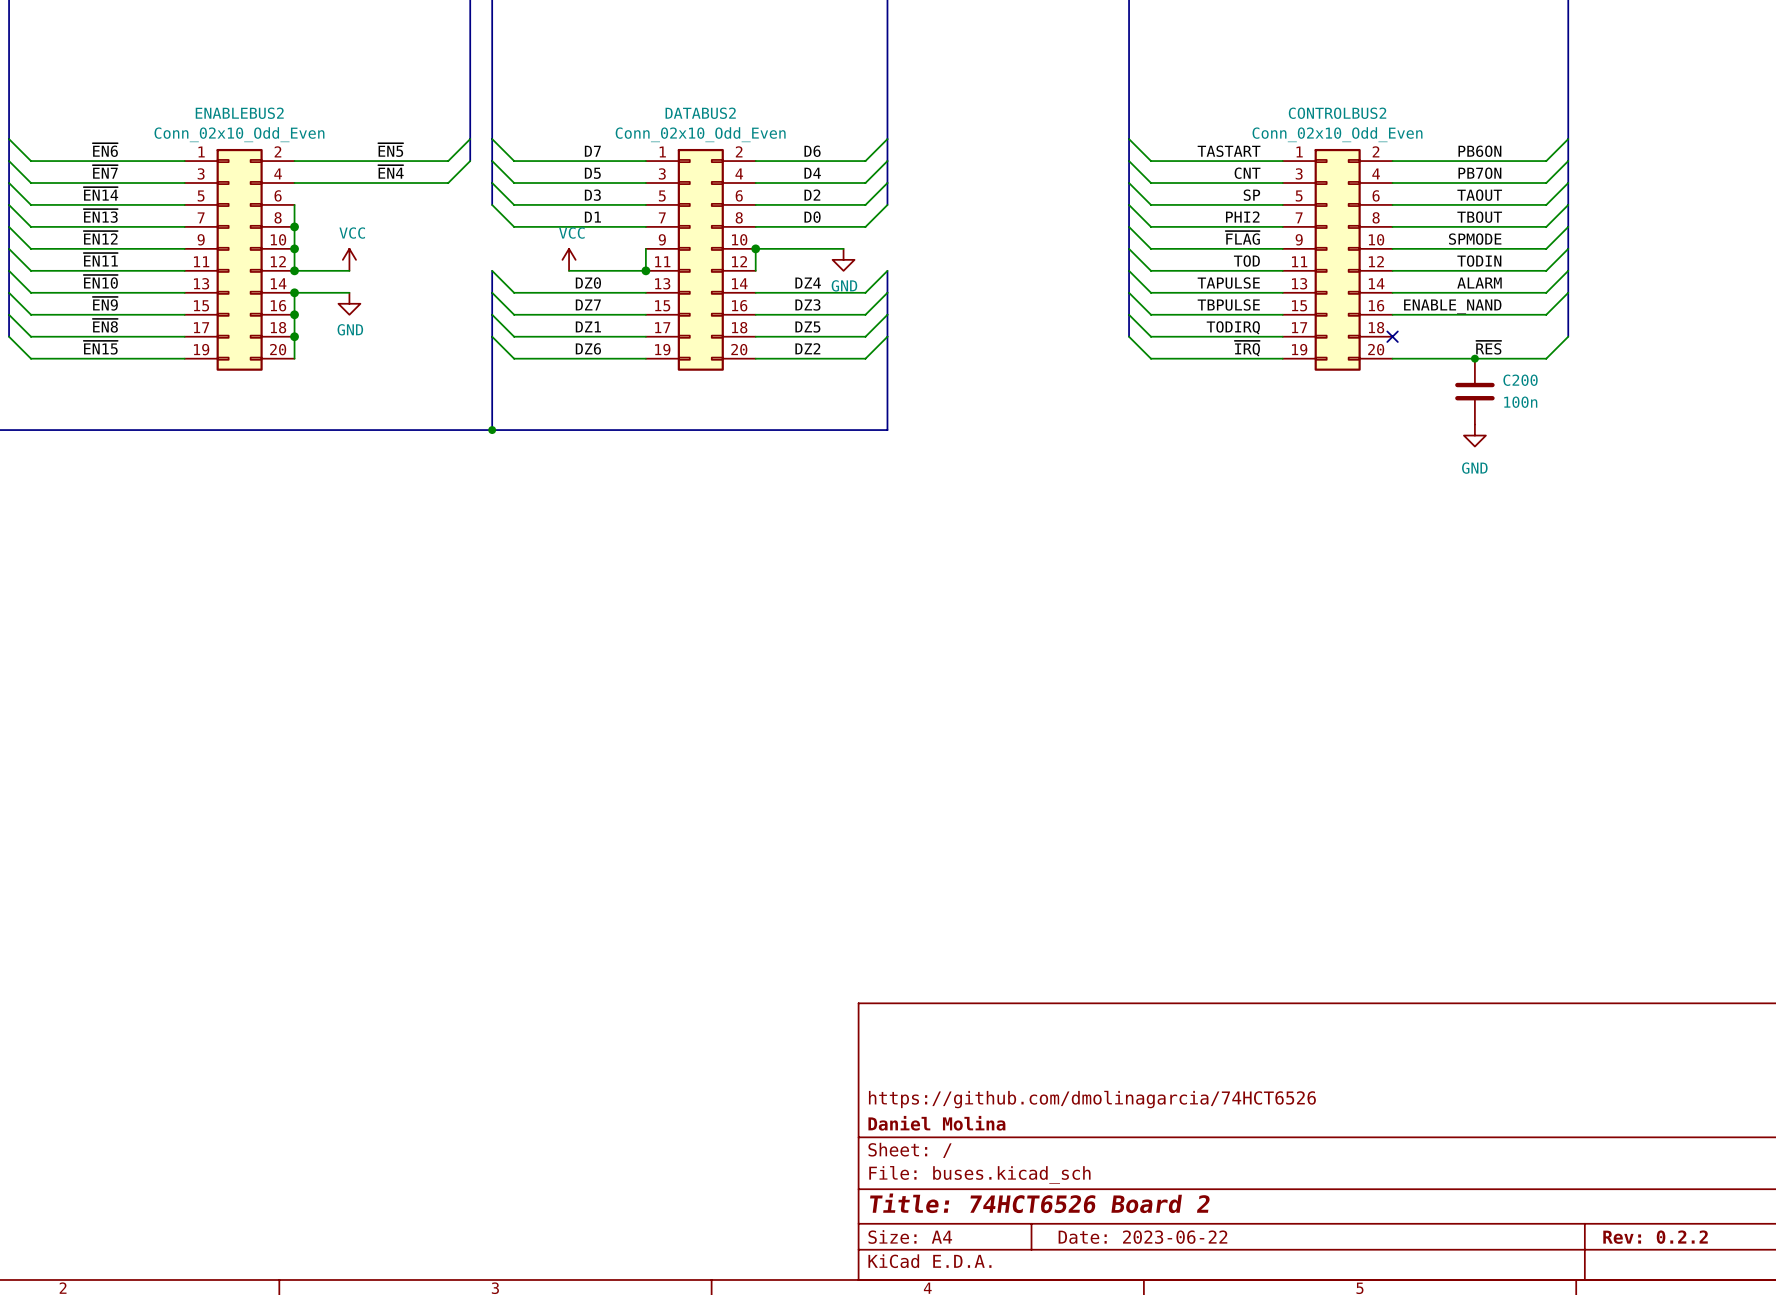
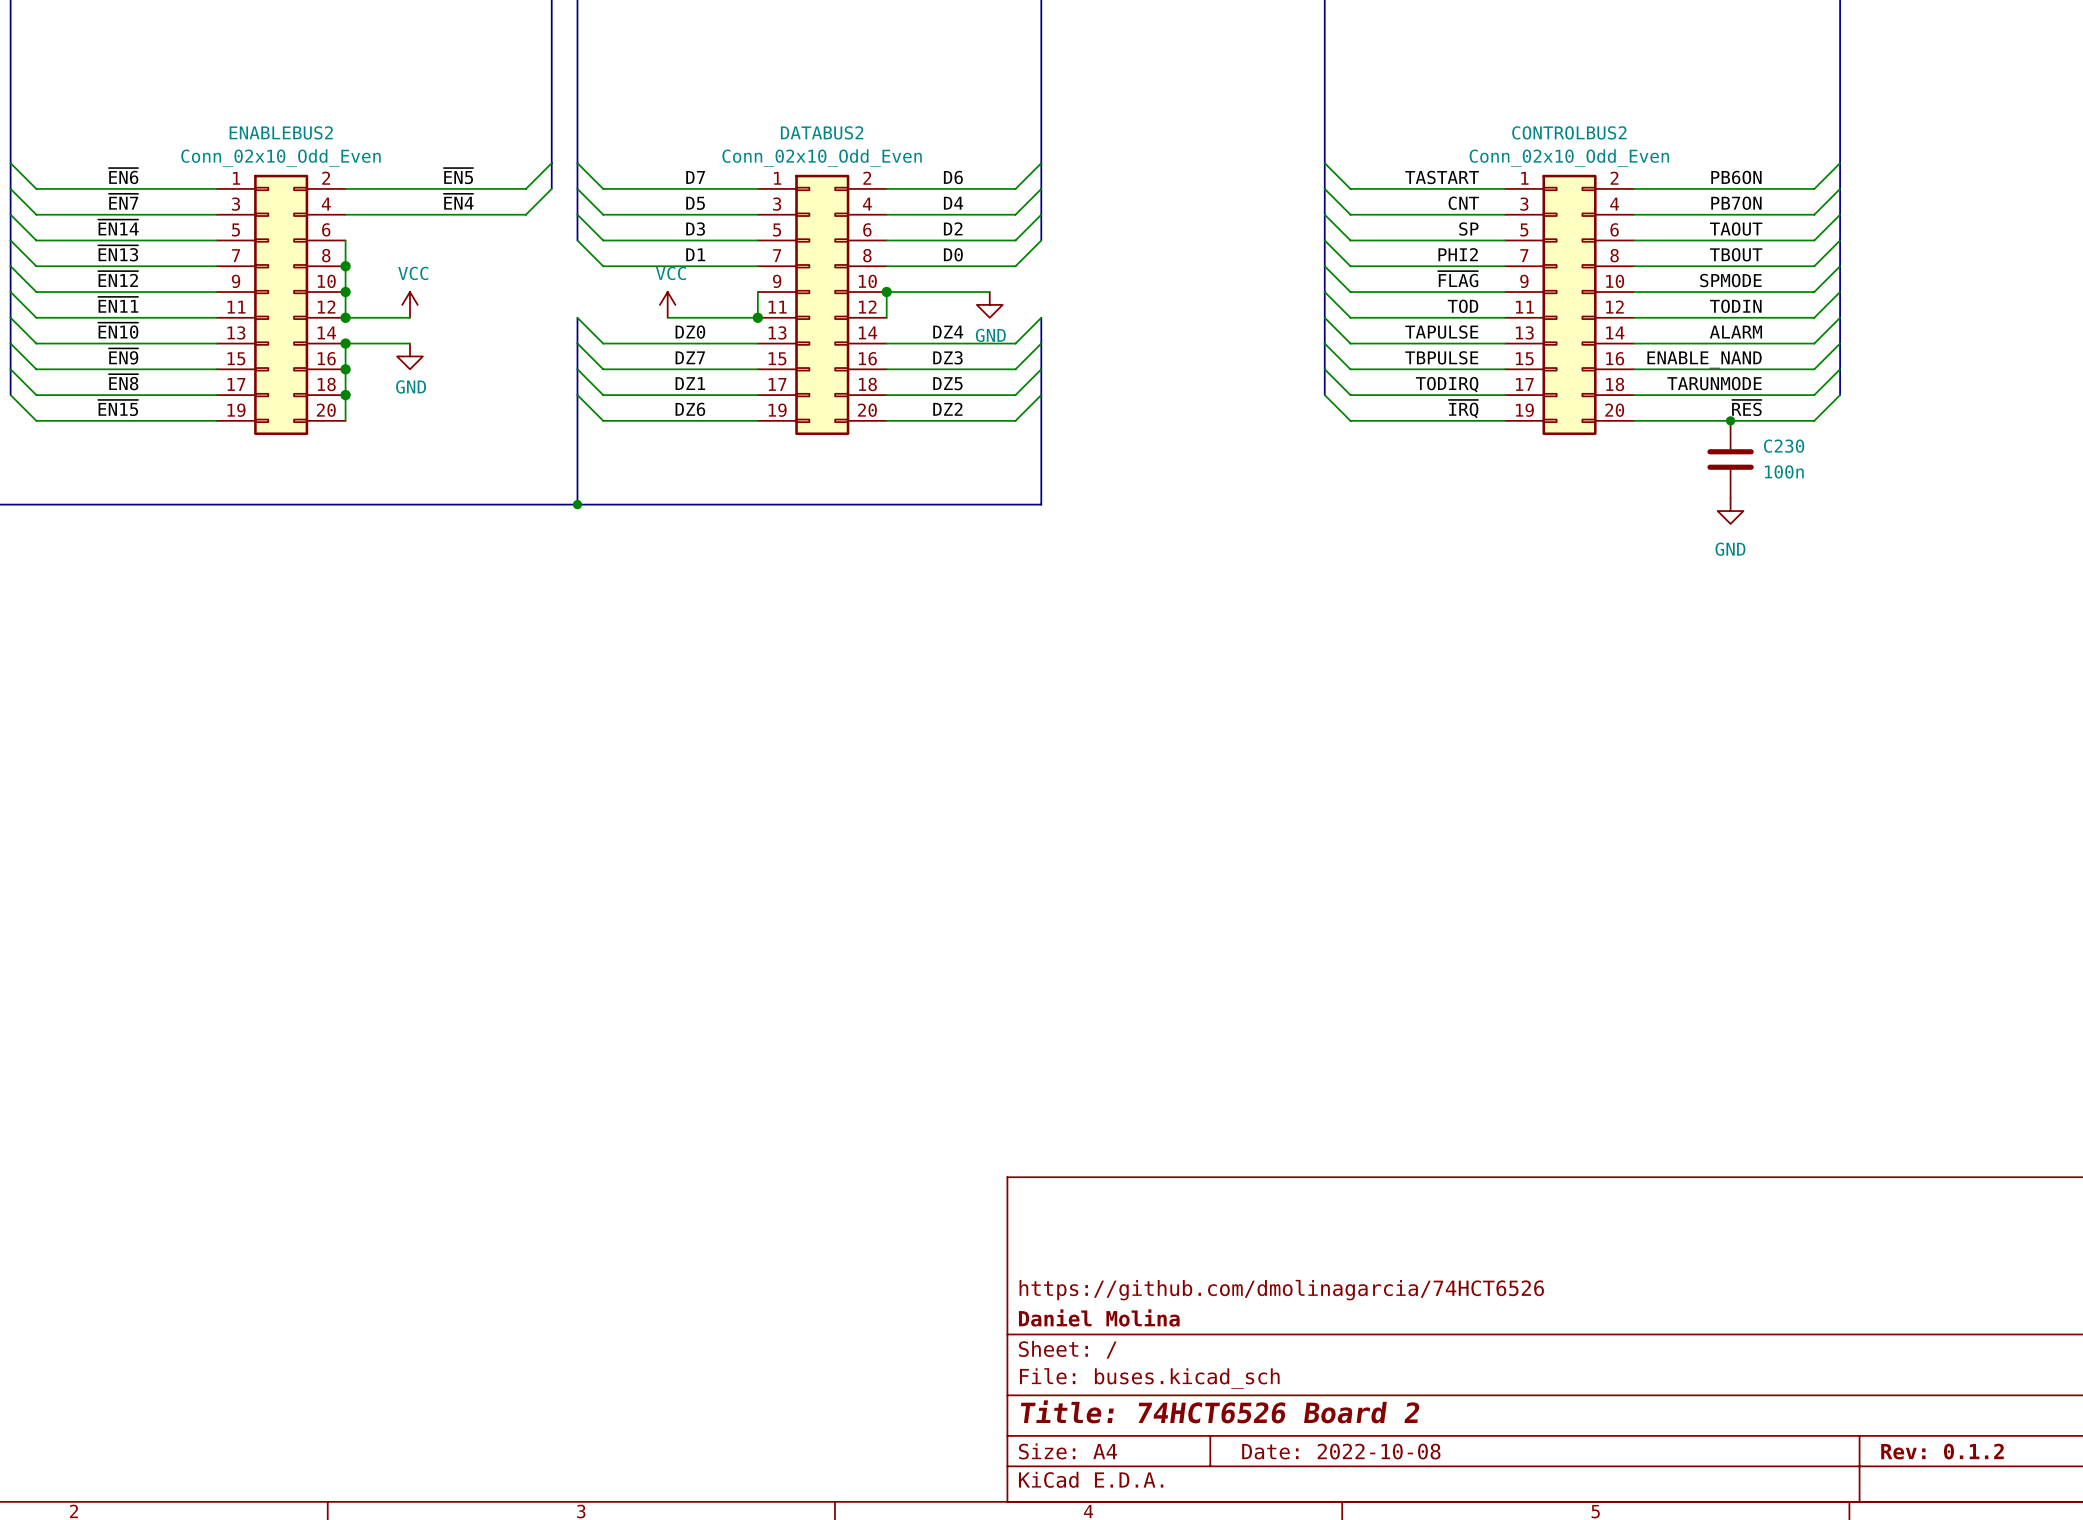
wire: none -> (1840, 369) (1814, 395) (1633, 395)
label: none -> TARUNMODE (1714, 383)
no-connect mark: (1392, 336) -> none
C200 name: C200 (1520, 380) -> C230 (1784, 446)
title block: Date: 2023-06-22 (1142, 1237) -> Date: 2022-10-08 (1341, 1451)
title block: Rev: 0.2.2 (1655, 1237) -> Rev: 0.1.2 (1942, 1451)

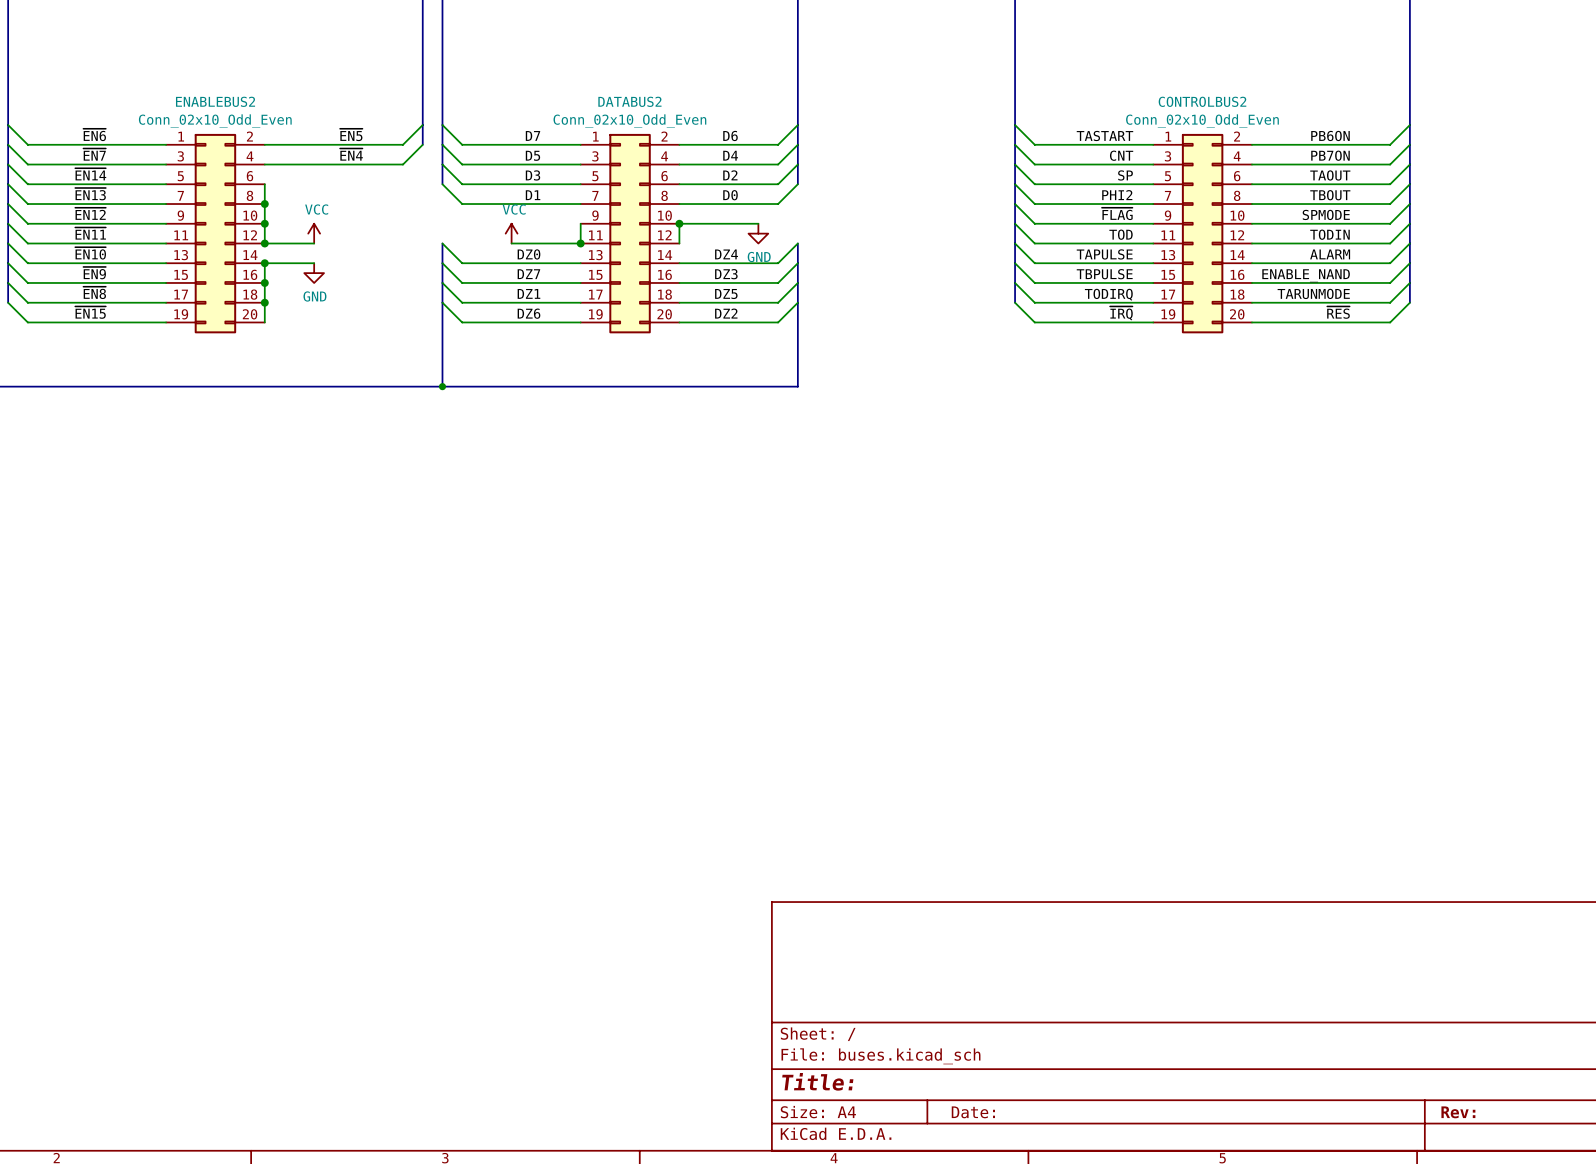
junction: (1730, 420) -> none
C230: 100n (1730, 459) -> none
power symbol: GND (1730, 511) -> none
title block: https://github.com/dmolinagarcia/74HCT6526 (1281, 1290) -> none
title block: Daniel Molina (1099, 1317) -> none
title block: Title: 74HCT6526 Board 2 (1220, 1411) -> Title: (817, 1081)
title block: Date: 2022-10-08 (1341, 1451) -> Date: (973, 1112)
title block: Rev: 0.1.2 (1942, 1451) -> Rev: (1458, 1112)

